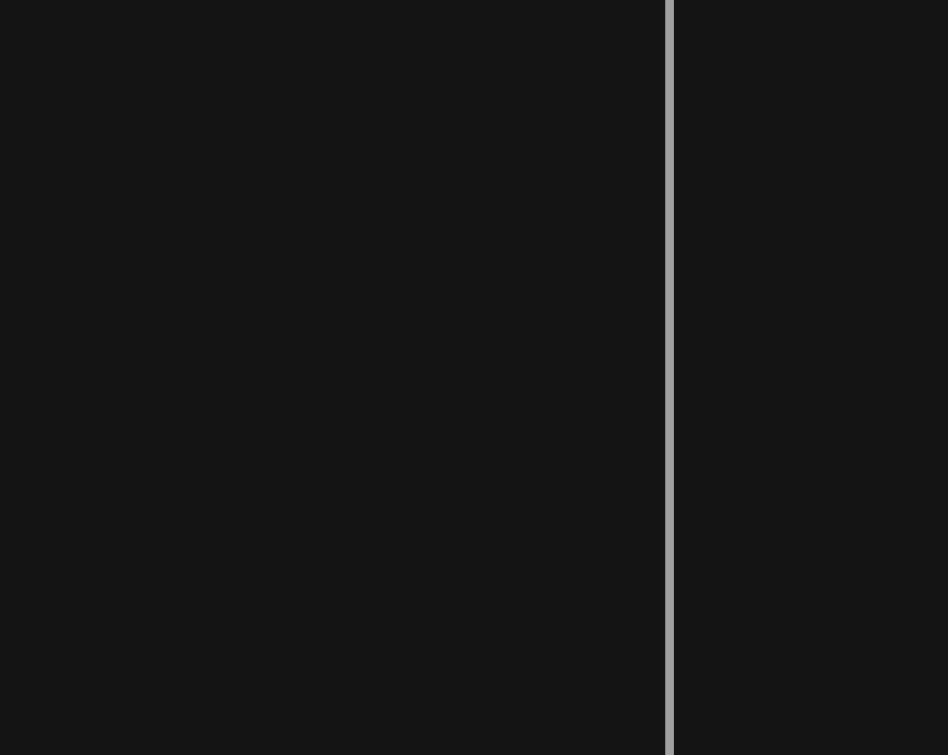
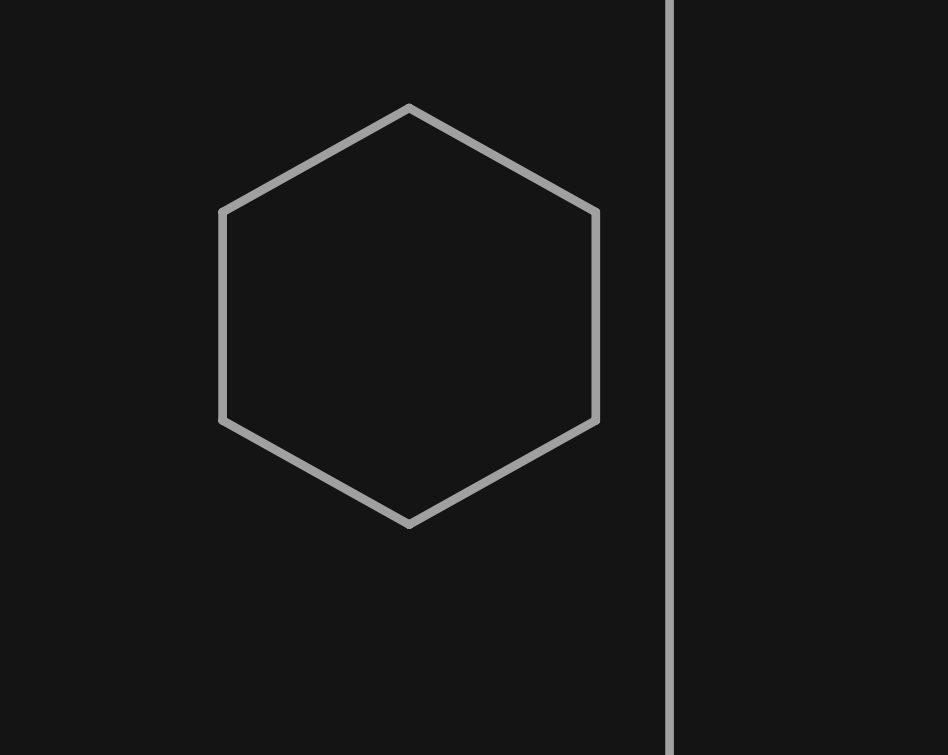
drawing: none -> [218, 103, 601, 529]

